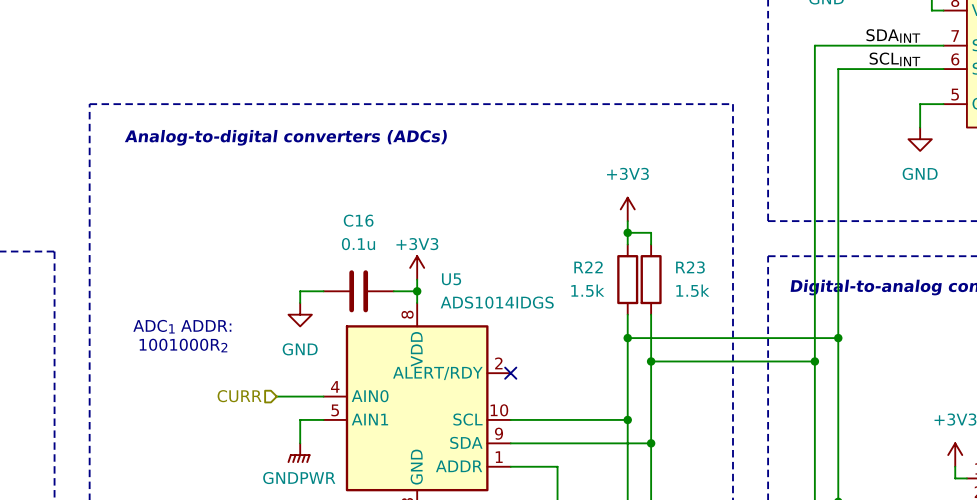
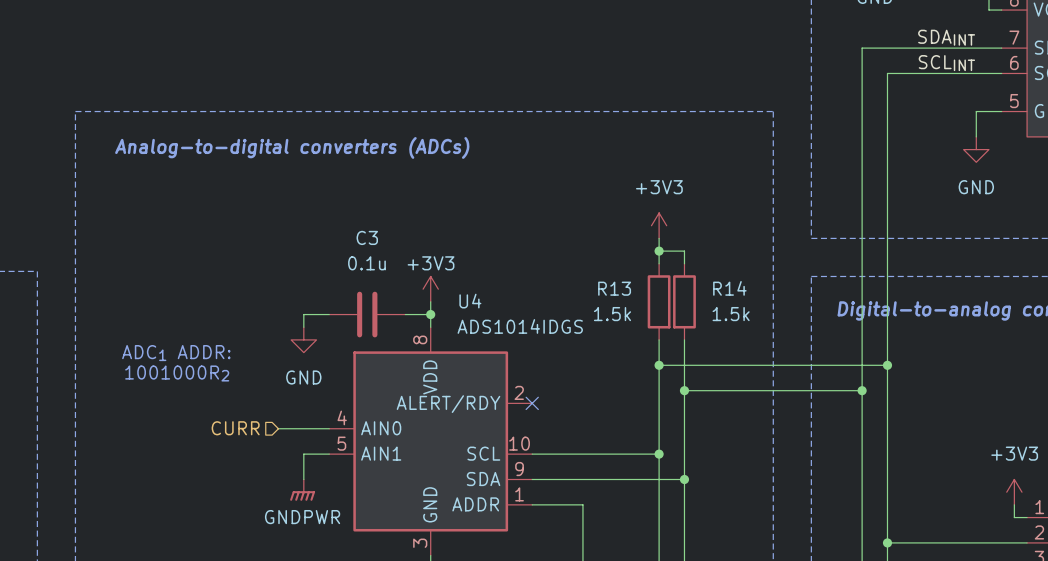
C16 name: C16 (358, 220) -> C3 (367, 237)
R22 name: R22 (588, 267) -> R13 (614, 288)
R23 name: R23 (690, 267) -> R14 (729, 288)
U5 name: U5 (451, 279) -> U4 (470, 301)

